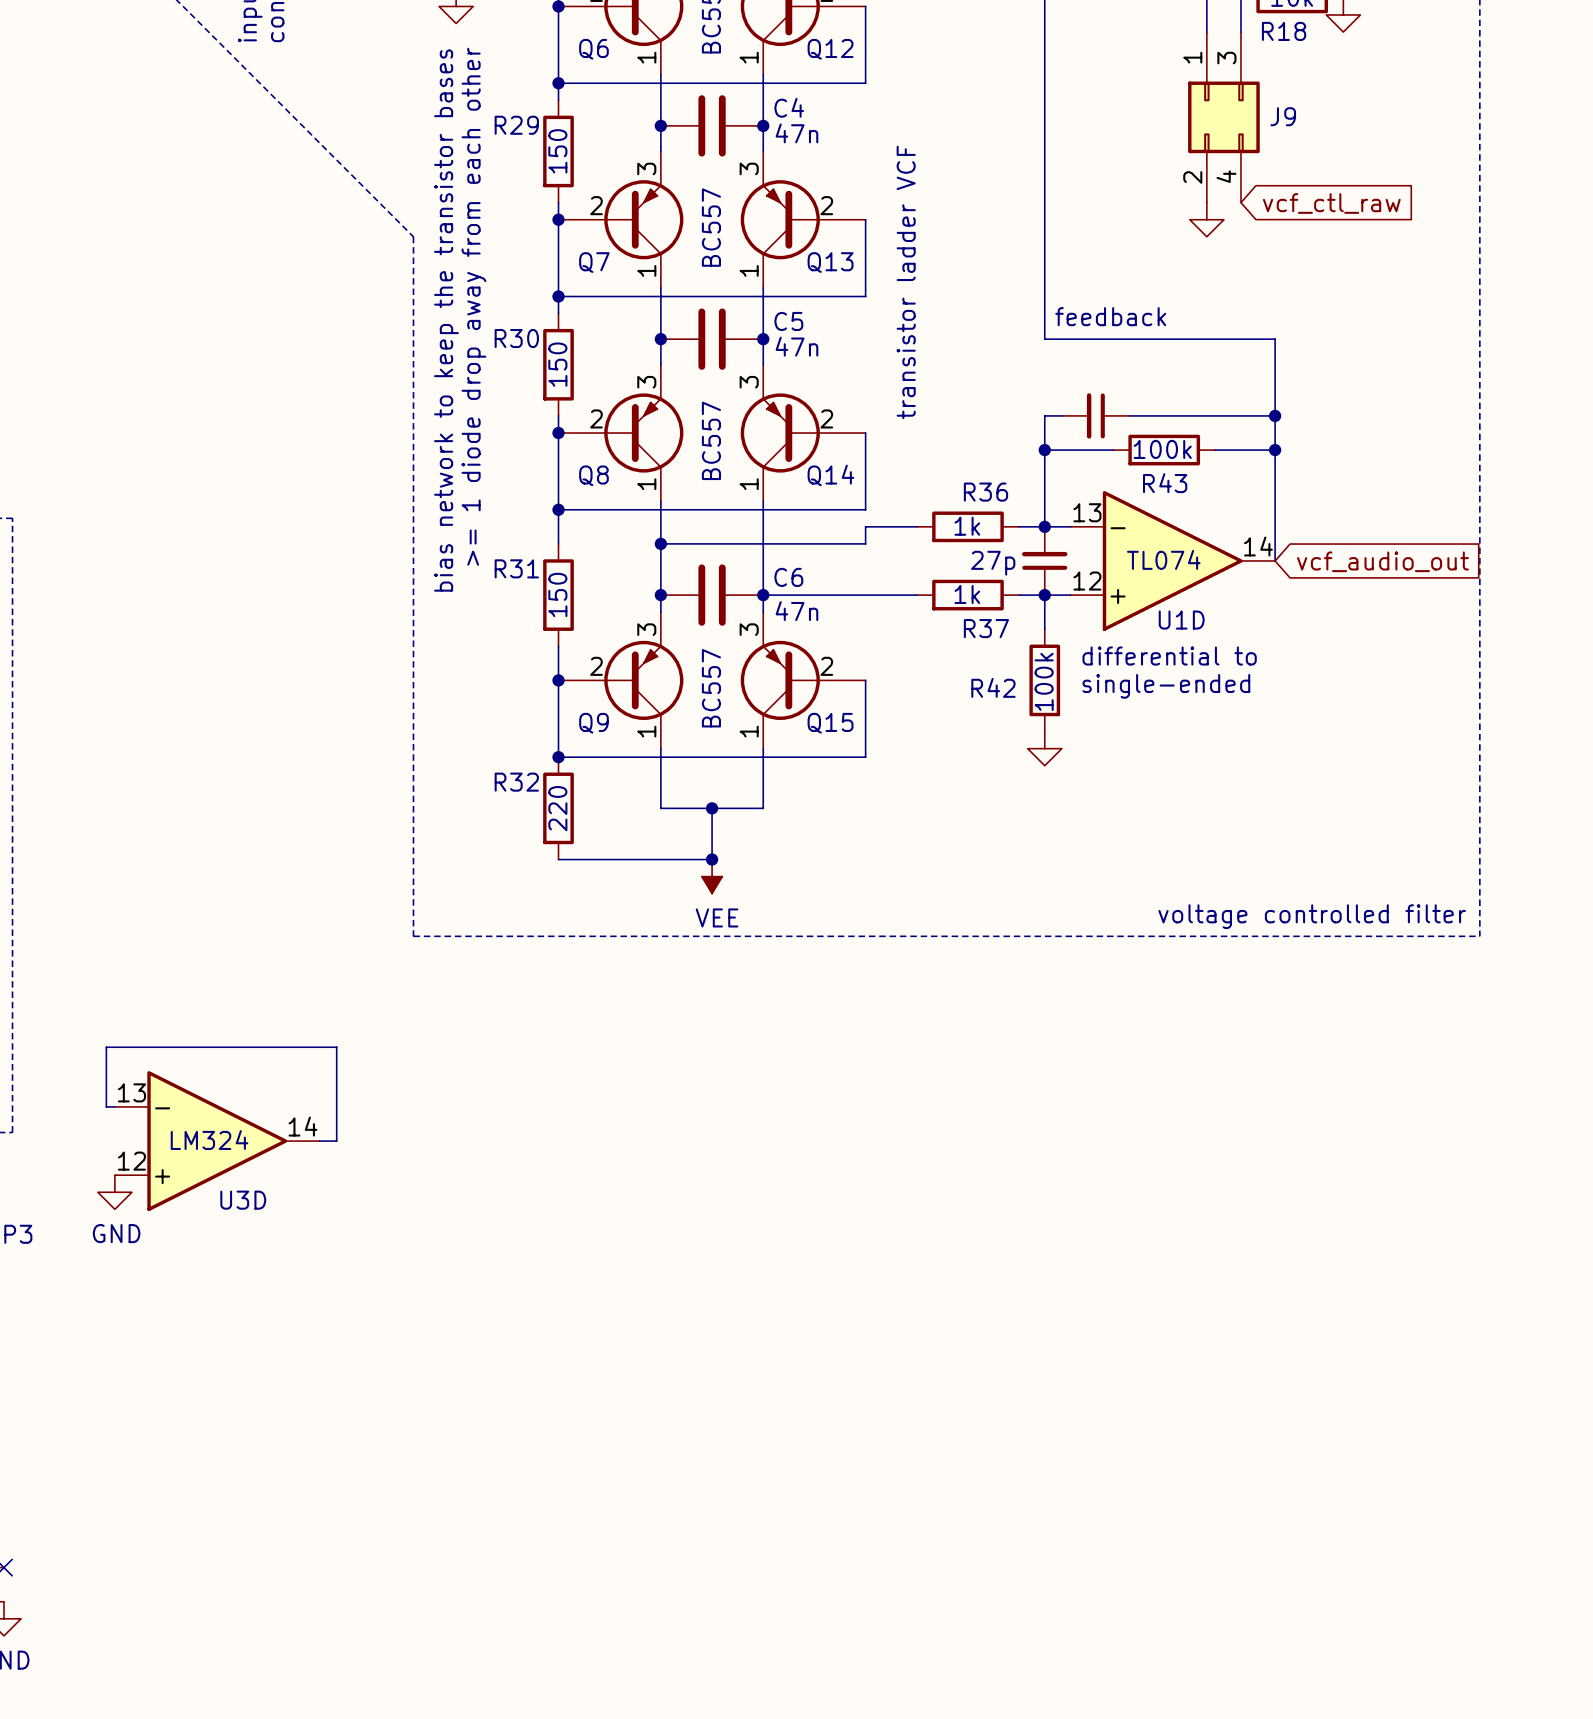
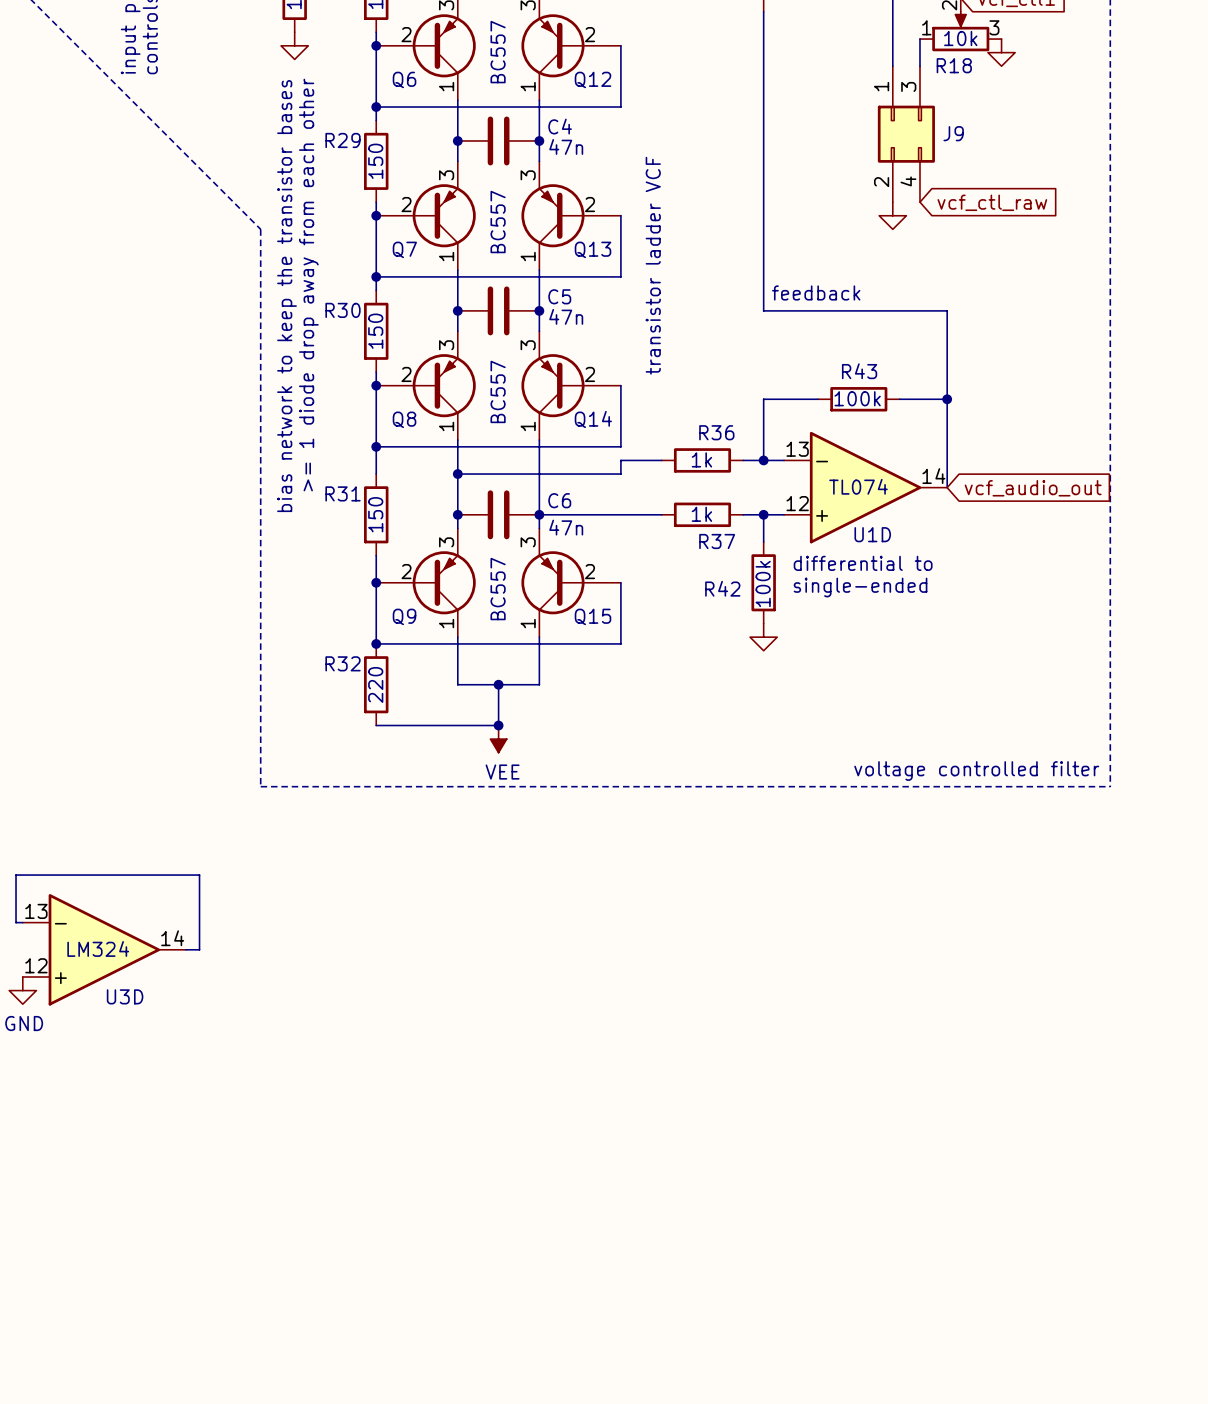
wire: (1061, 415) (1044, 415) (1044, 450) -> none
part: (1095, 415) -> none
wire: (1130, 415) (1275, 415) -> none
junction: (1275, 415) -> none
junction: (1044, 450) -> none
R43 name position: R43 (1165, 483) -> R43 (859, 371)
part: 27p (1044, 560) -> none

